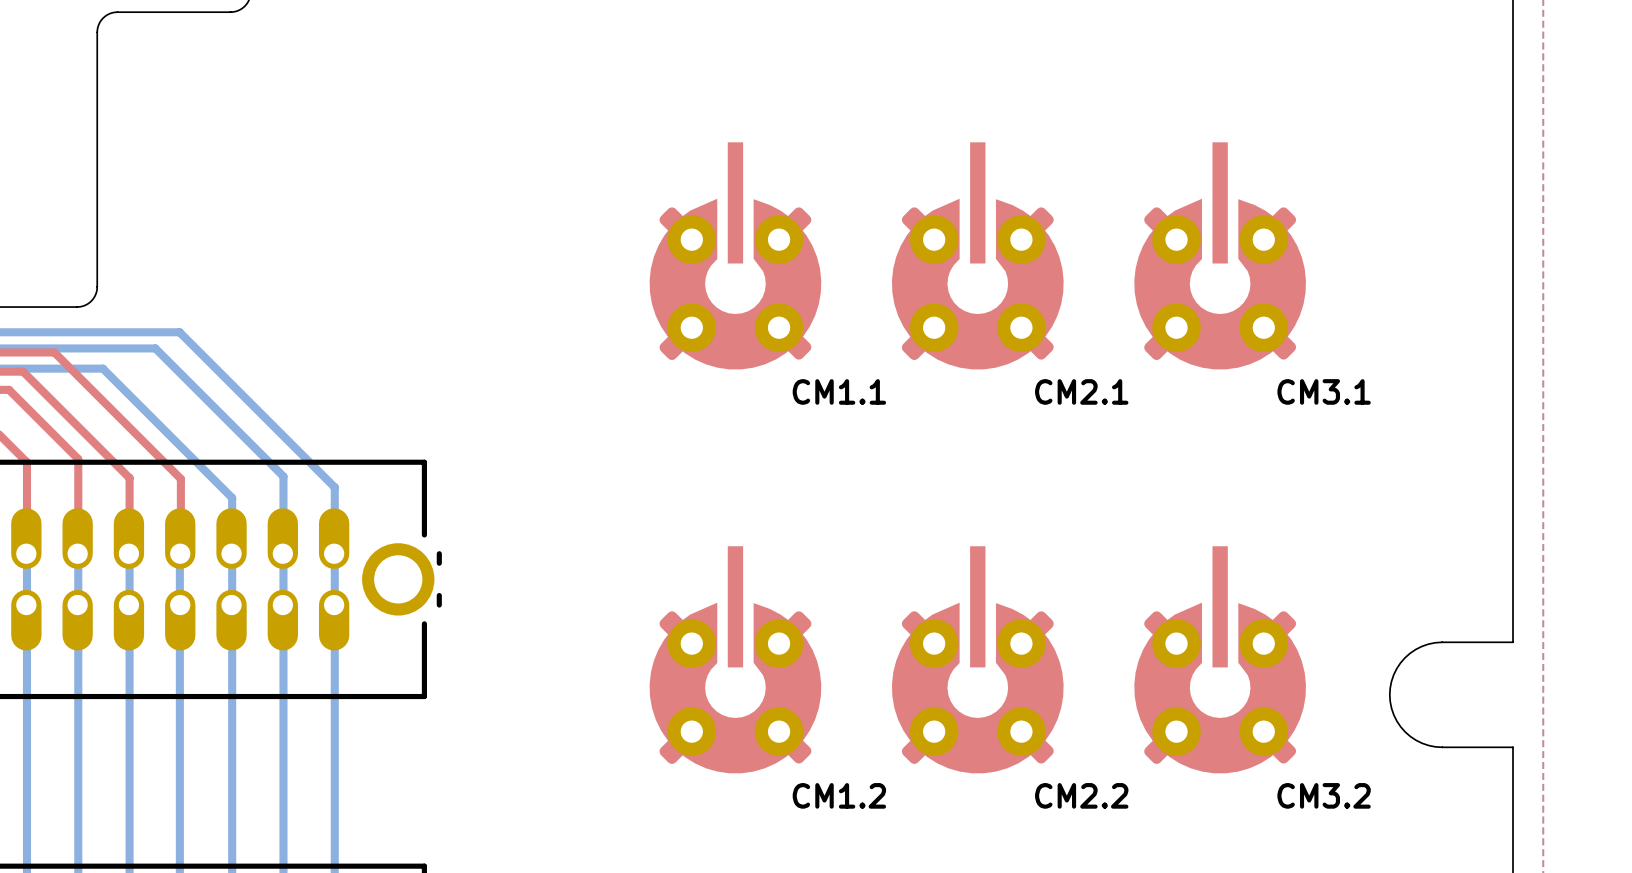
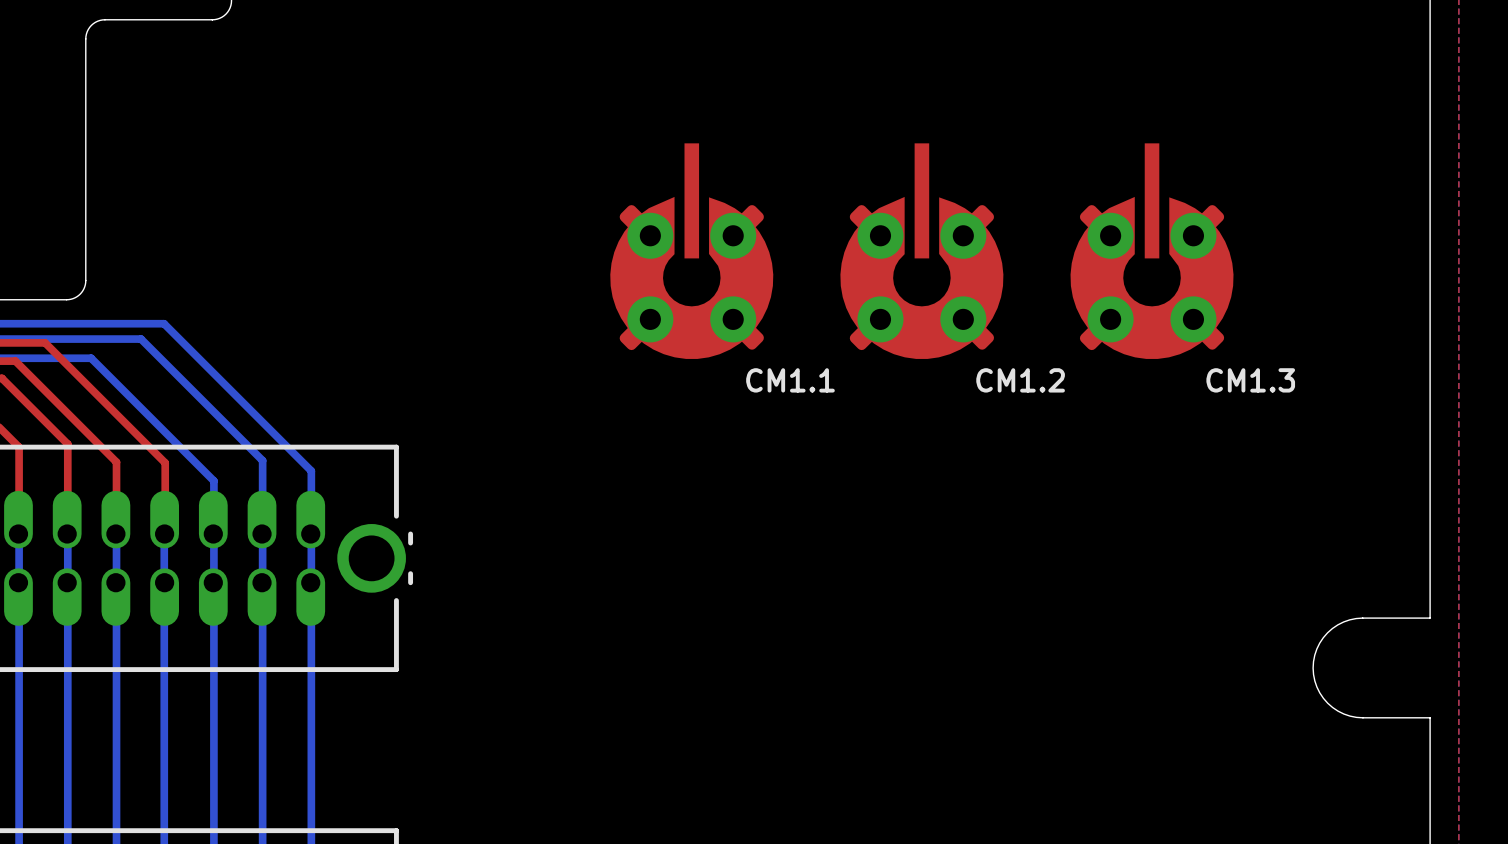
CM2.1 name: CM2.1 (1081, 391) -> CM1.2 (1020, 380)
CM3.1 name: CM3.1 (1324, 391) -> CM1.3 (1250, 380)
CM1.2: (735, 659) -> none
CM2.2: (977, 659) -> none
CM3.2: (1220, 659) -> none

